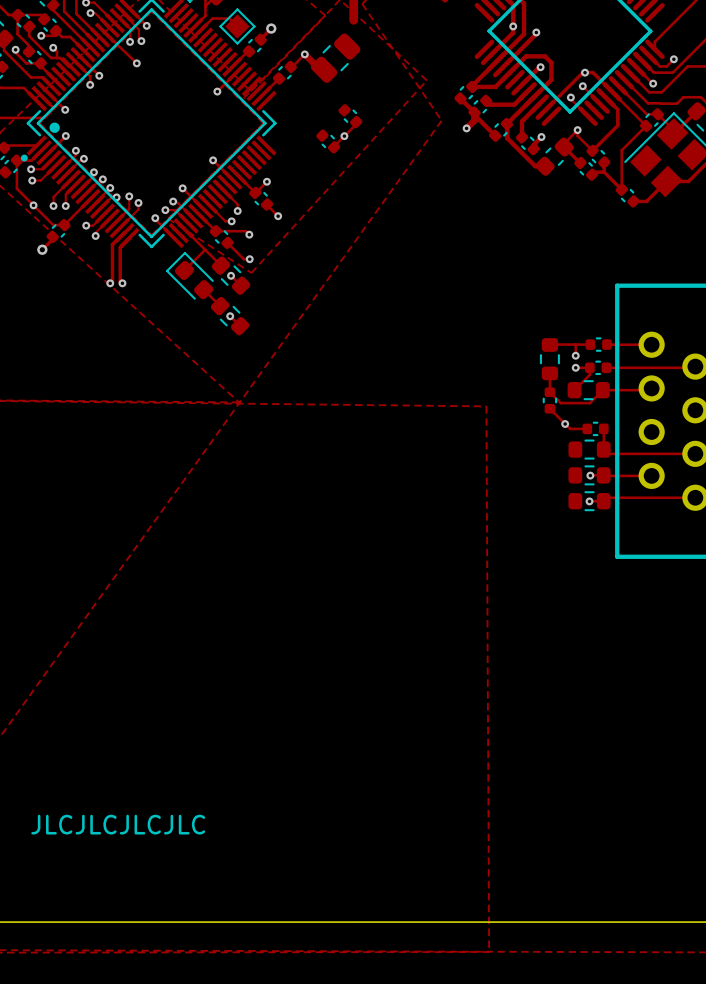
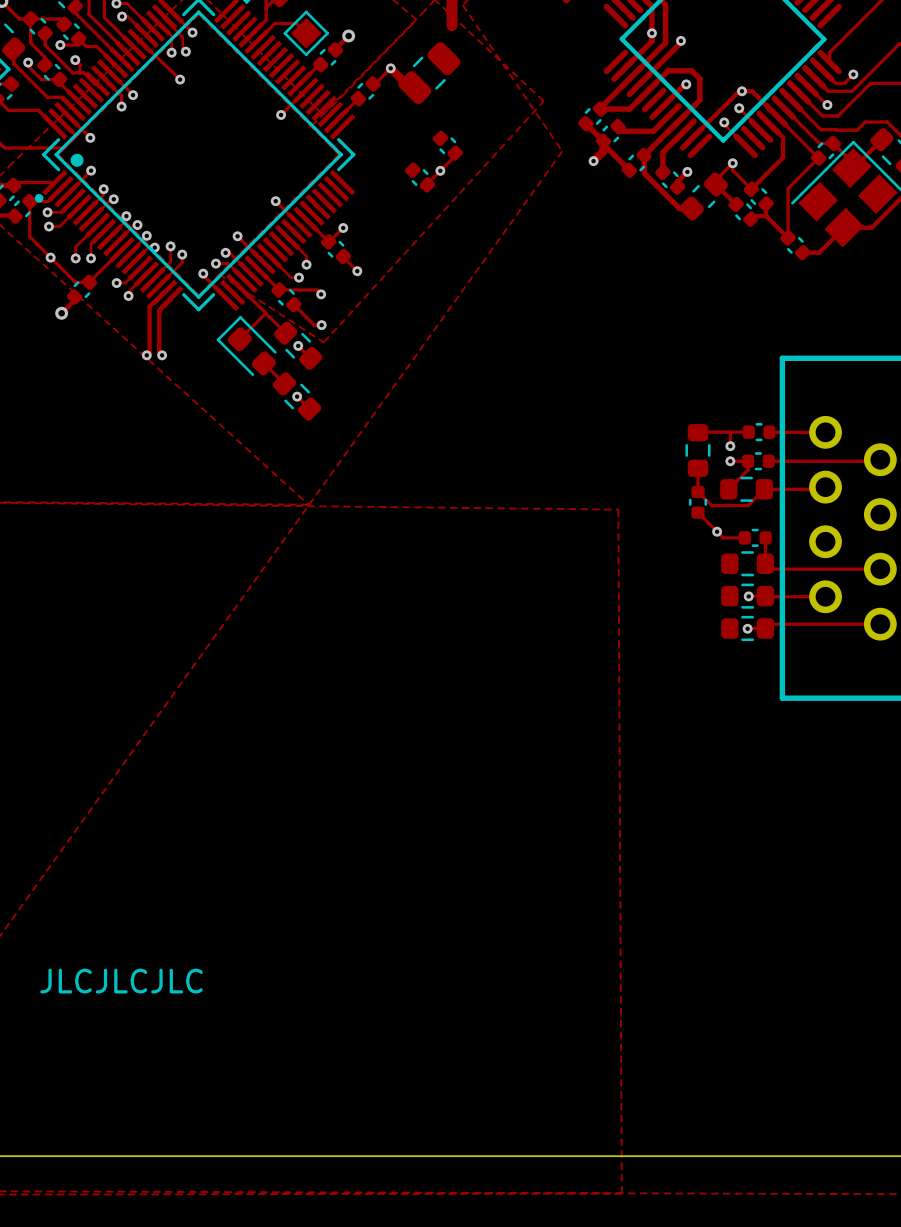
text: none -> JLCJLCJLC (121, 981)
text: JLCJLCJLCJLC (118, 824) -> none

